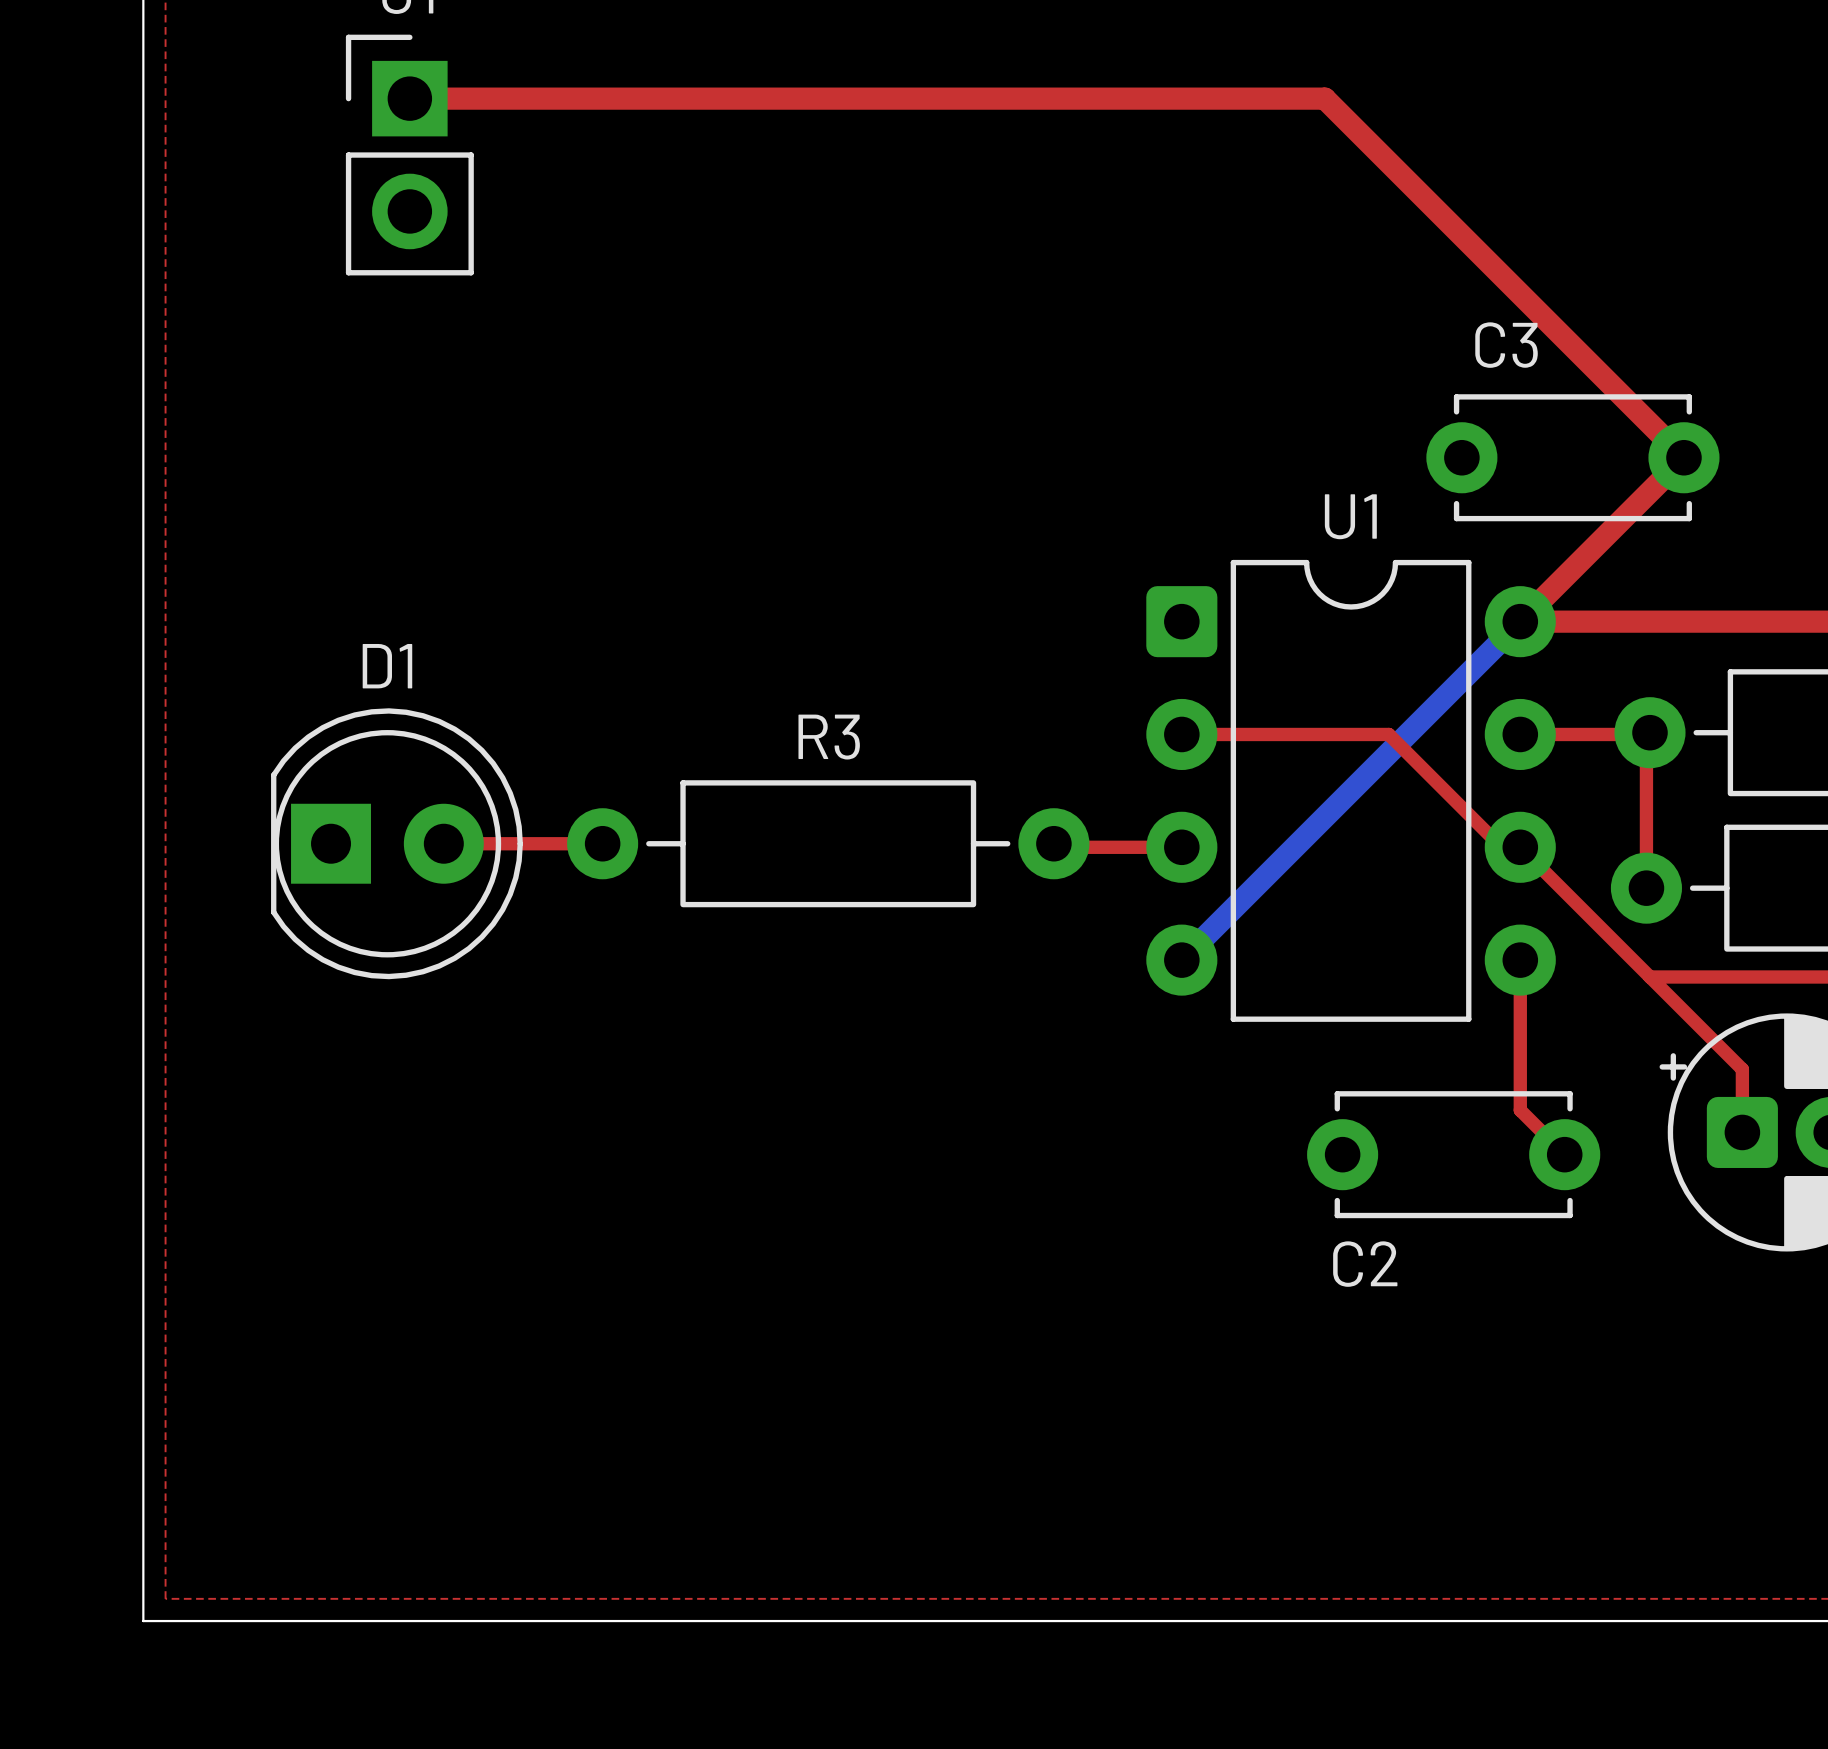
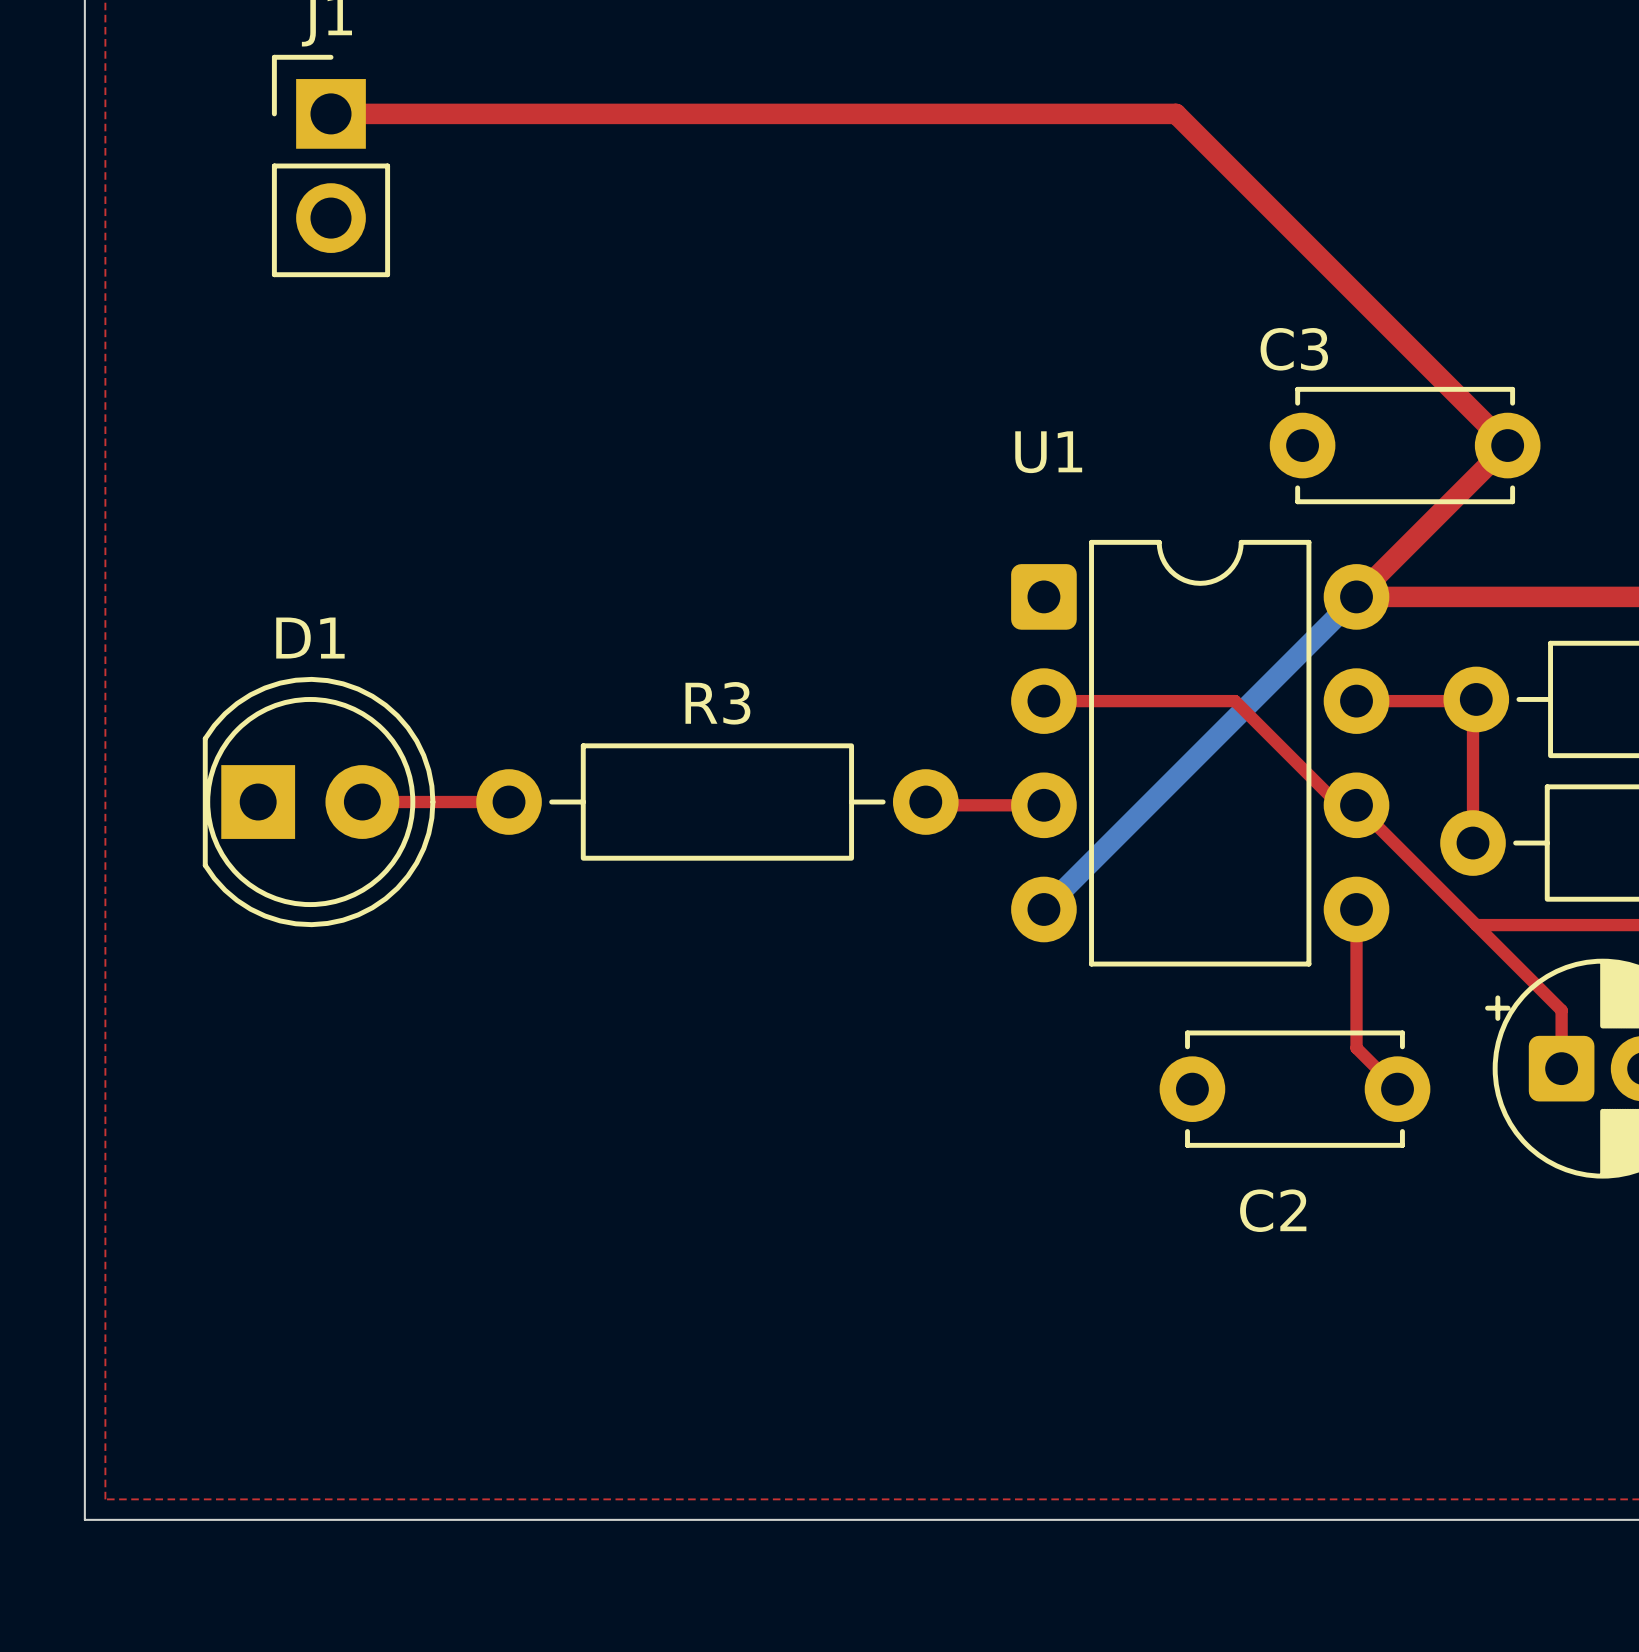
C3 name position: C3 (1506, 345) -> C3 (1294, 349)
U1 name position: U1 (1350, 516) -> U1 (1048, 452)
C2 name position: C2 (1365, 1264) -> C2 (1273, 1210)

